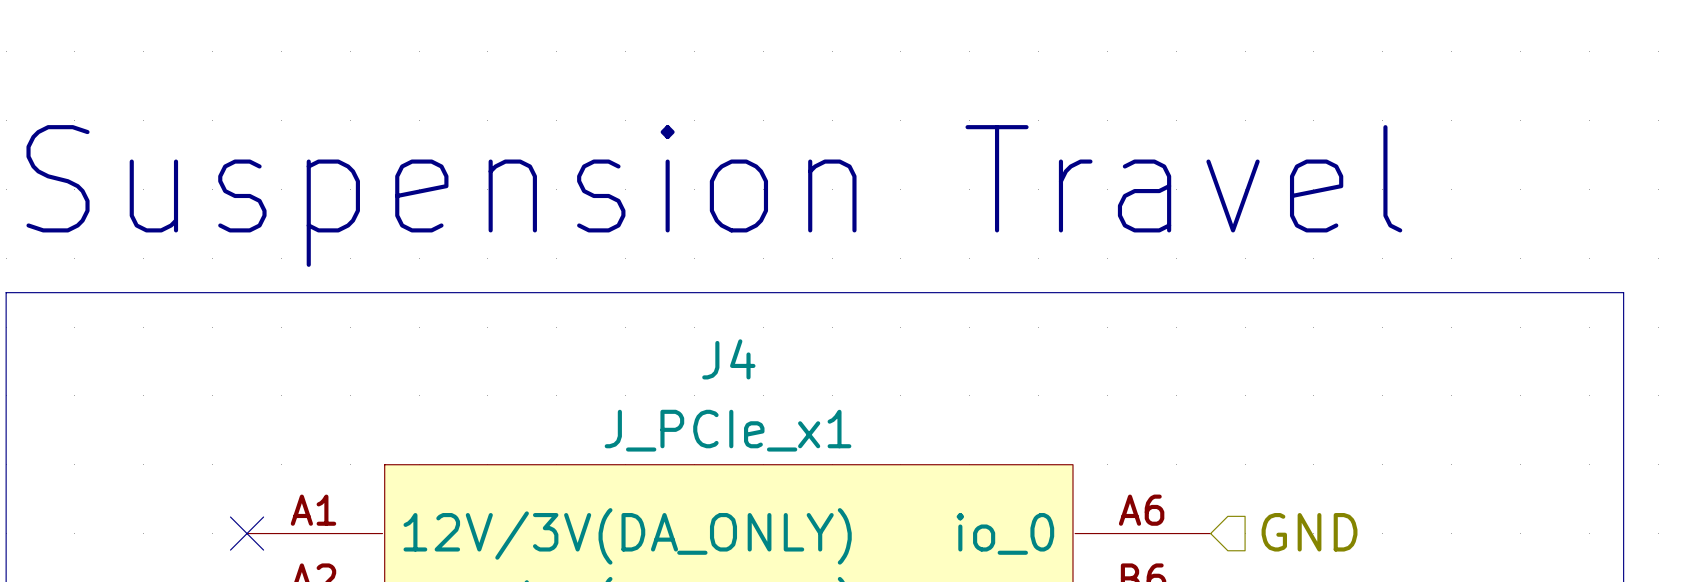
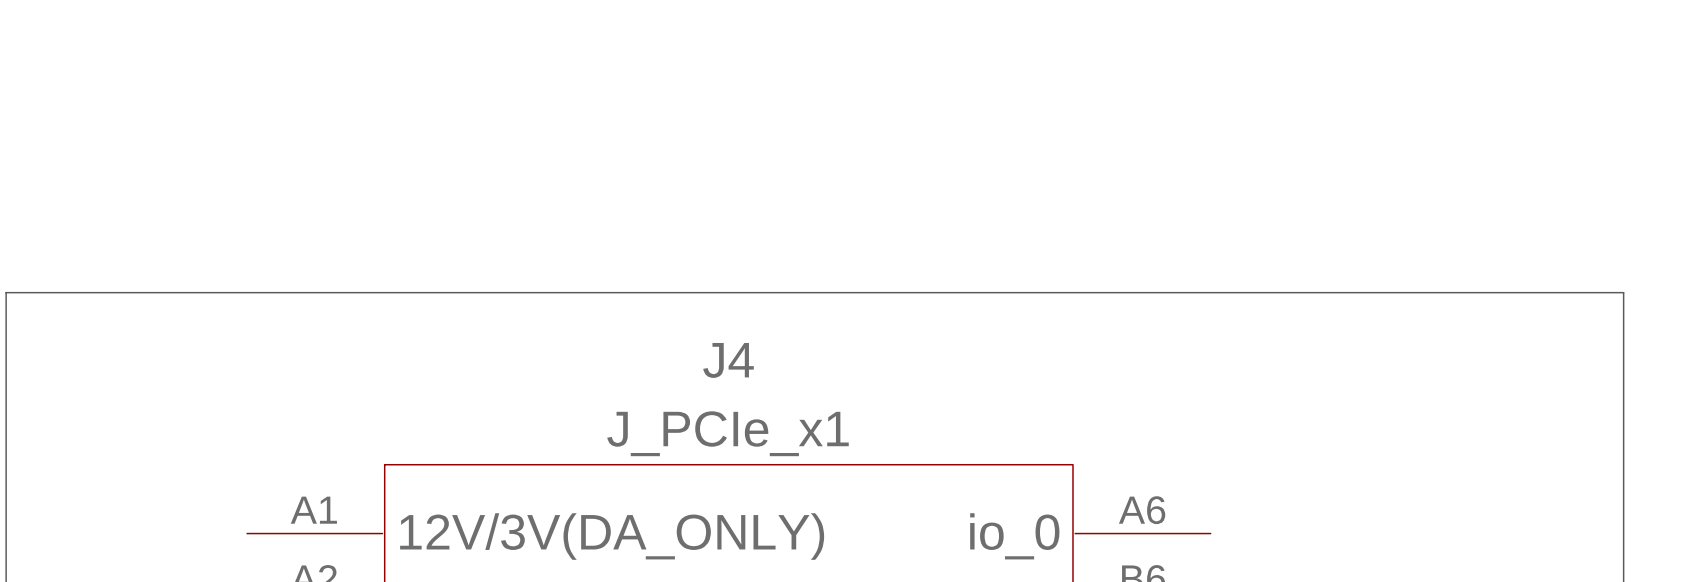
text: Suspension Travel (714, 195) -> none
hierarchical label: GND (1309, 532) -> none
no-connect mark: (247, 533) -> none

